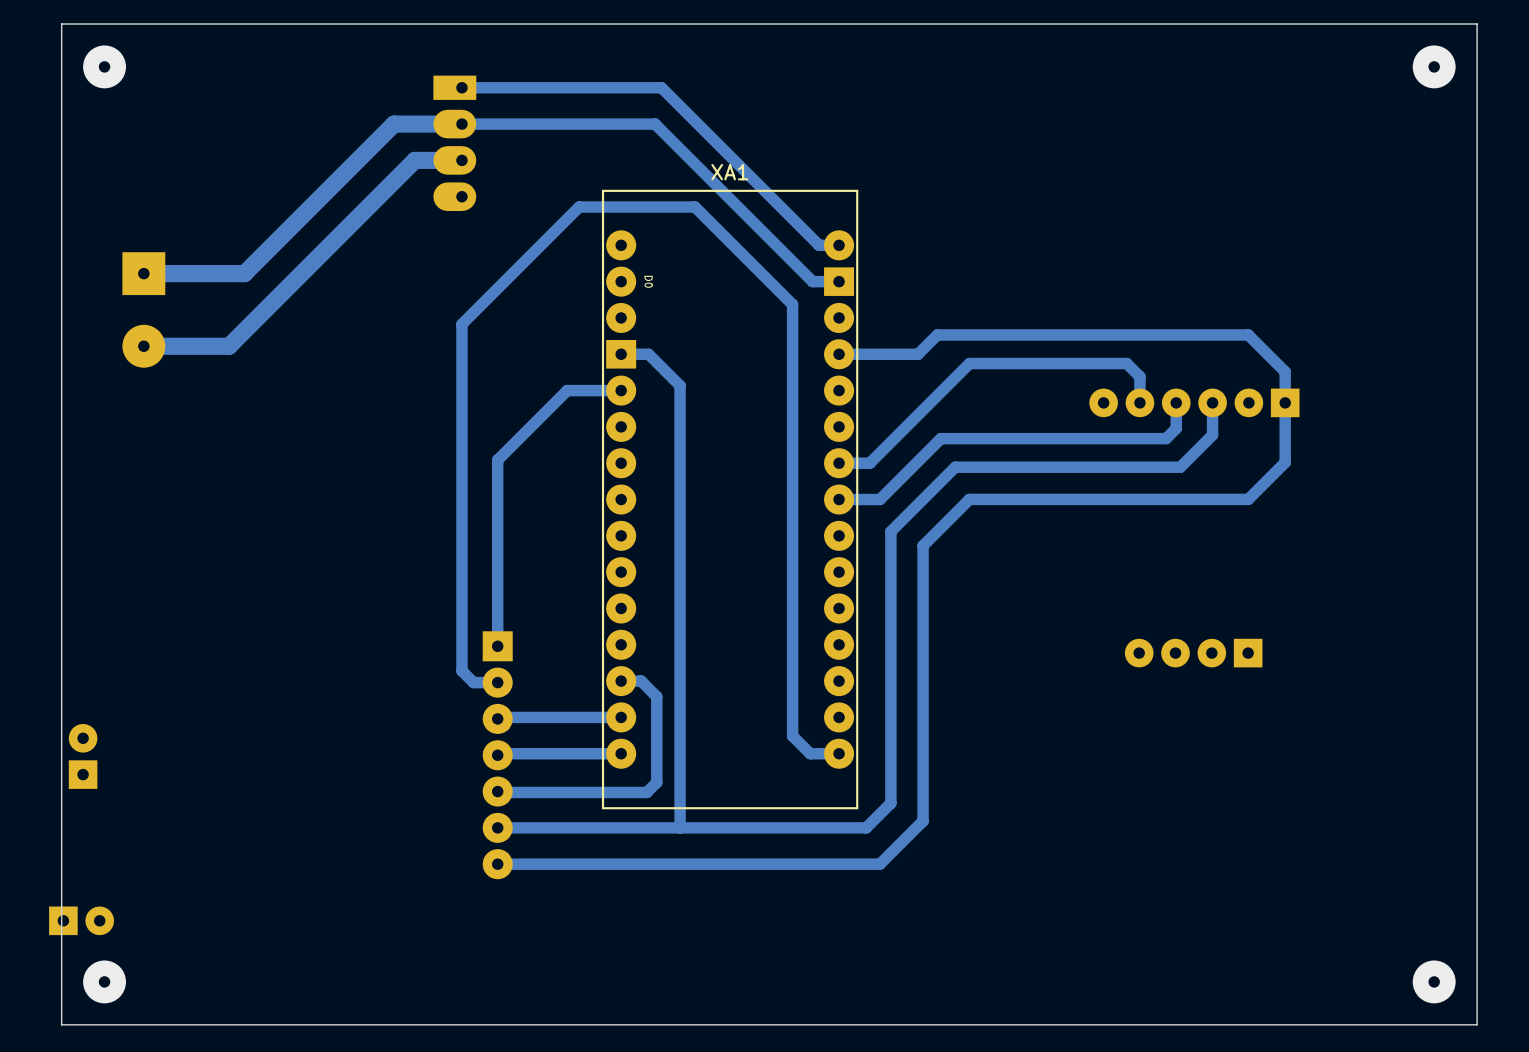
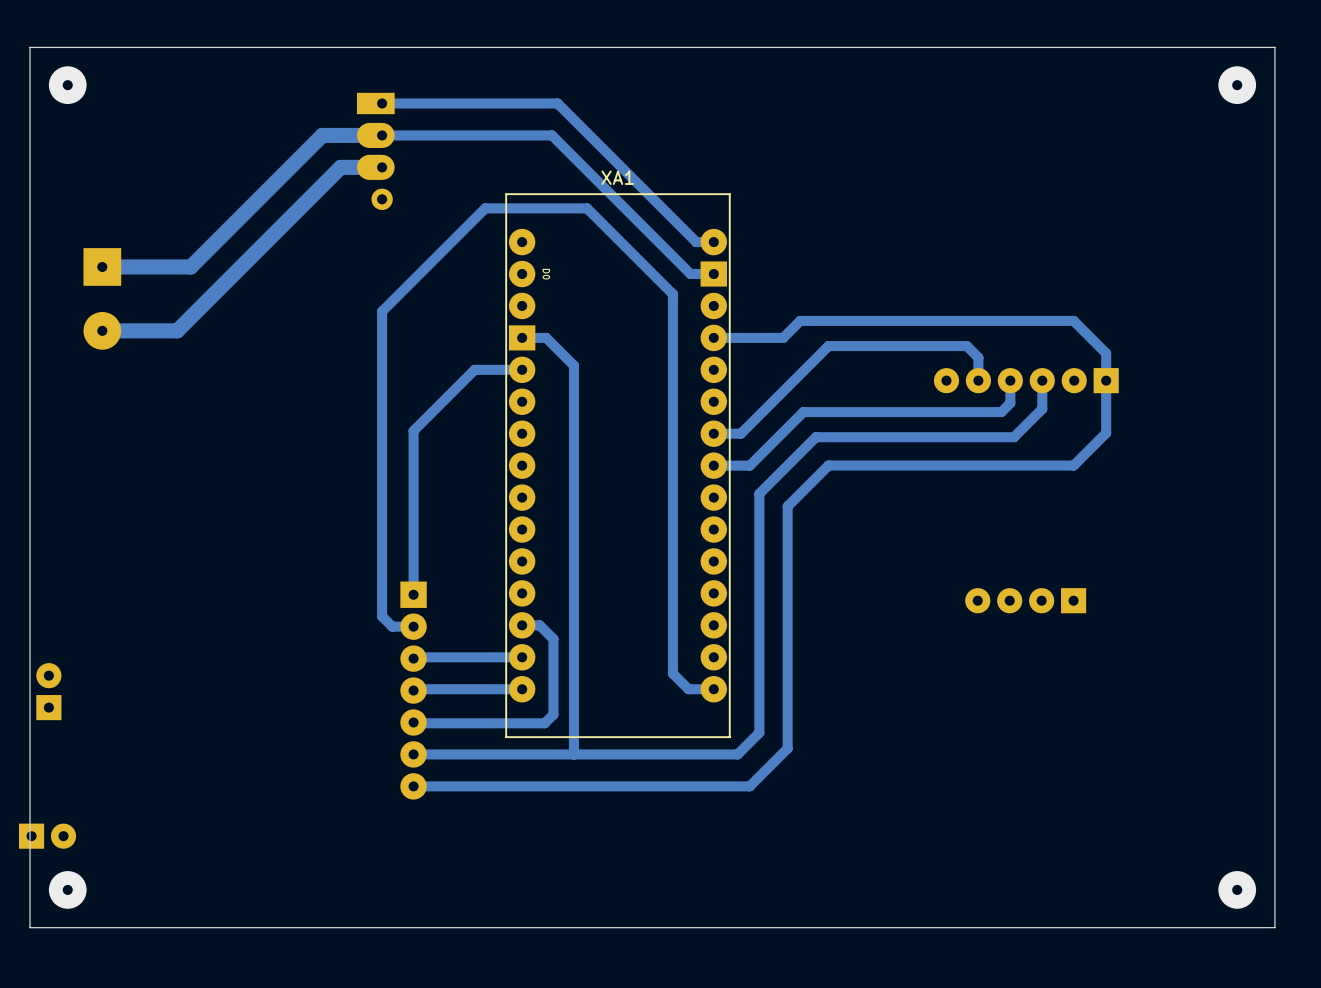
part footprint: [433, 75, 477, 212] -> [356, 92, 395, 211]

